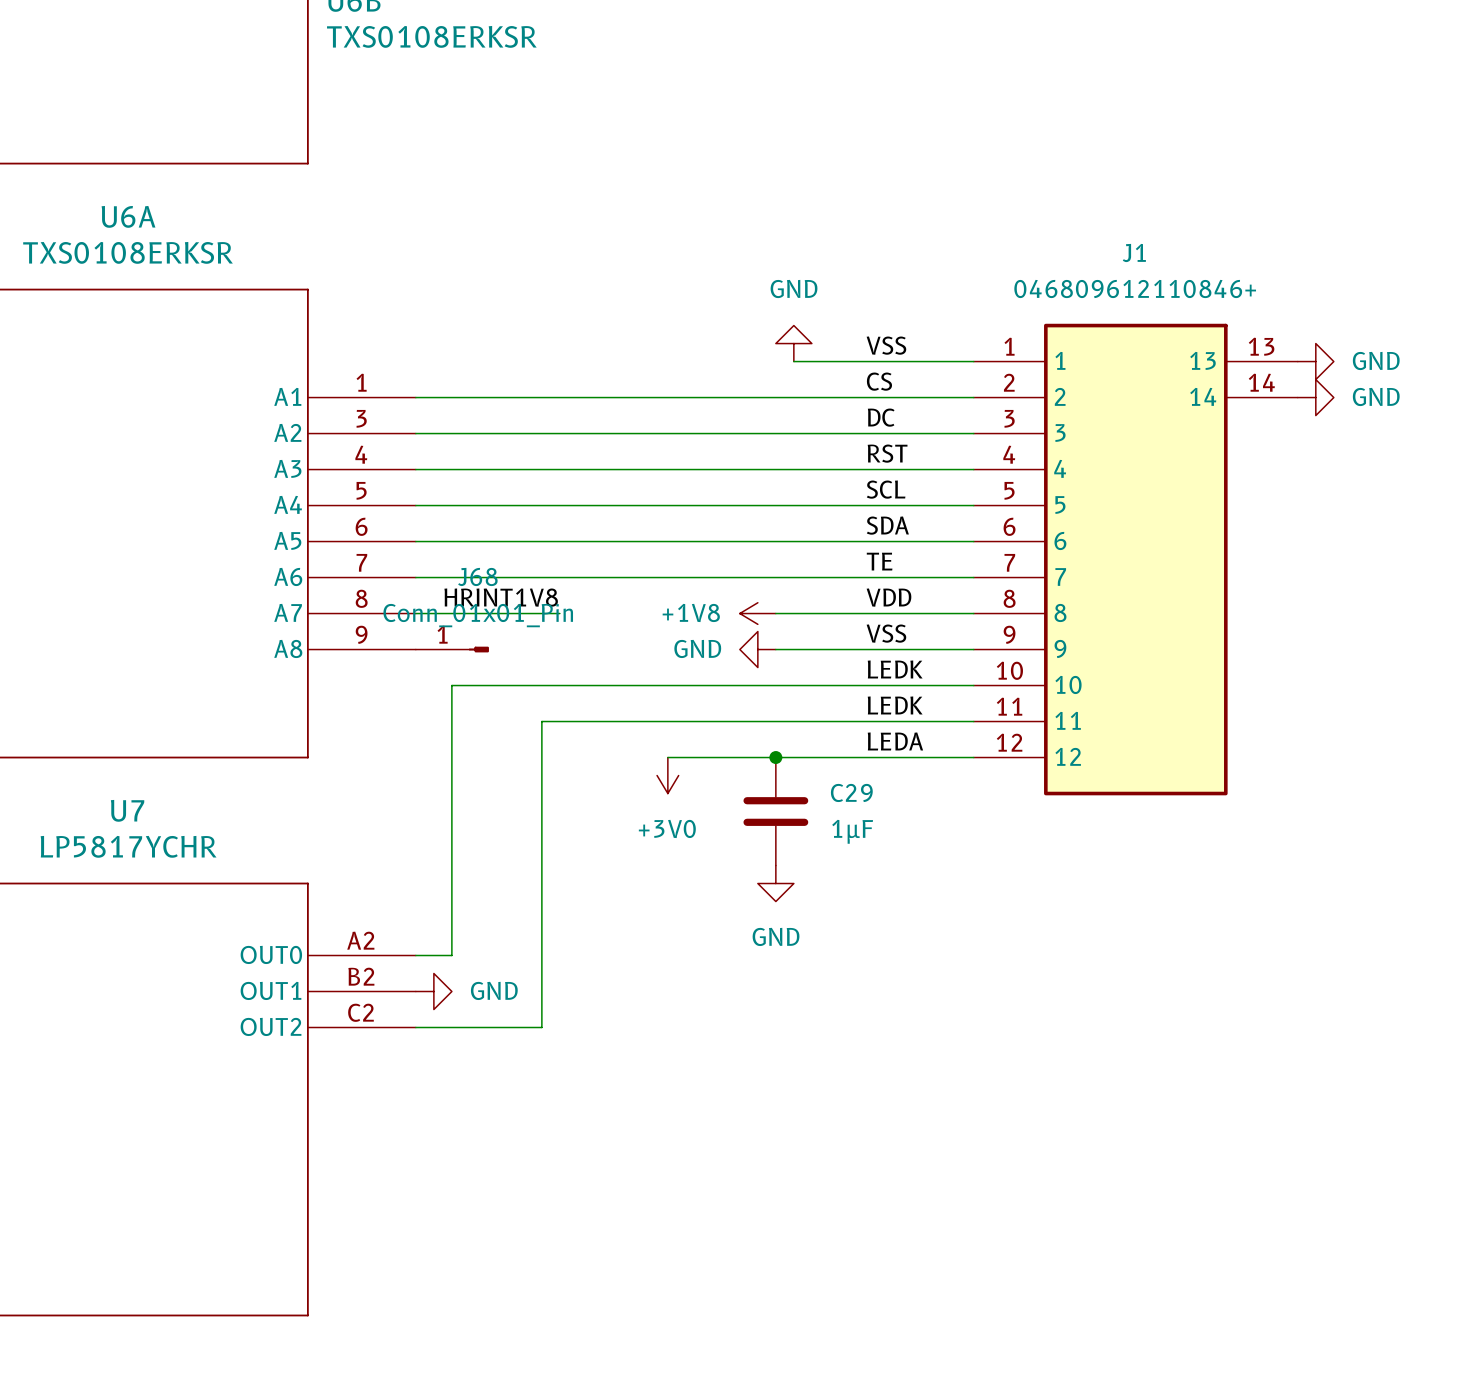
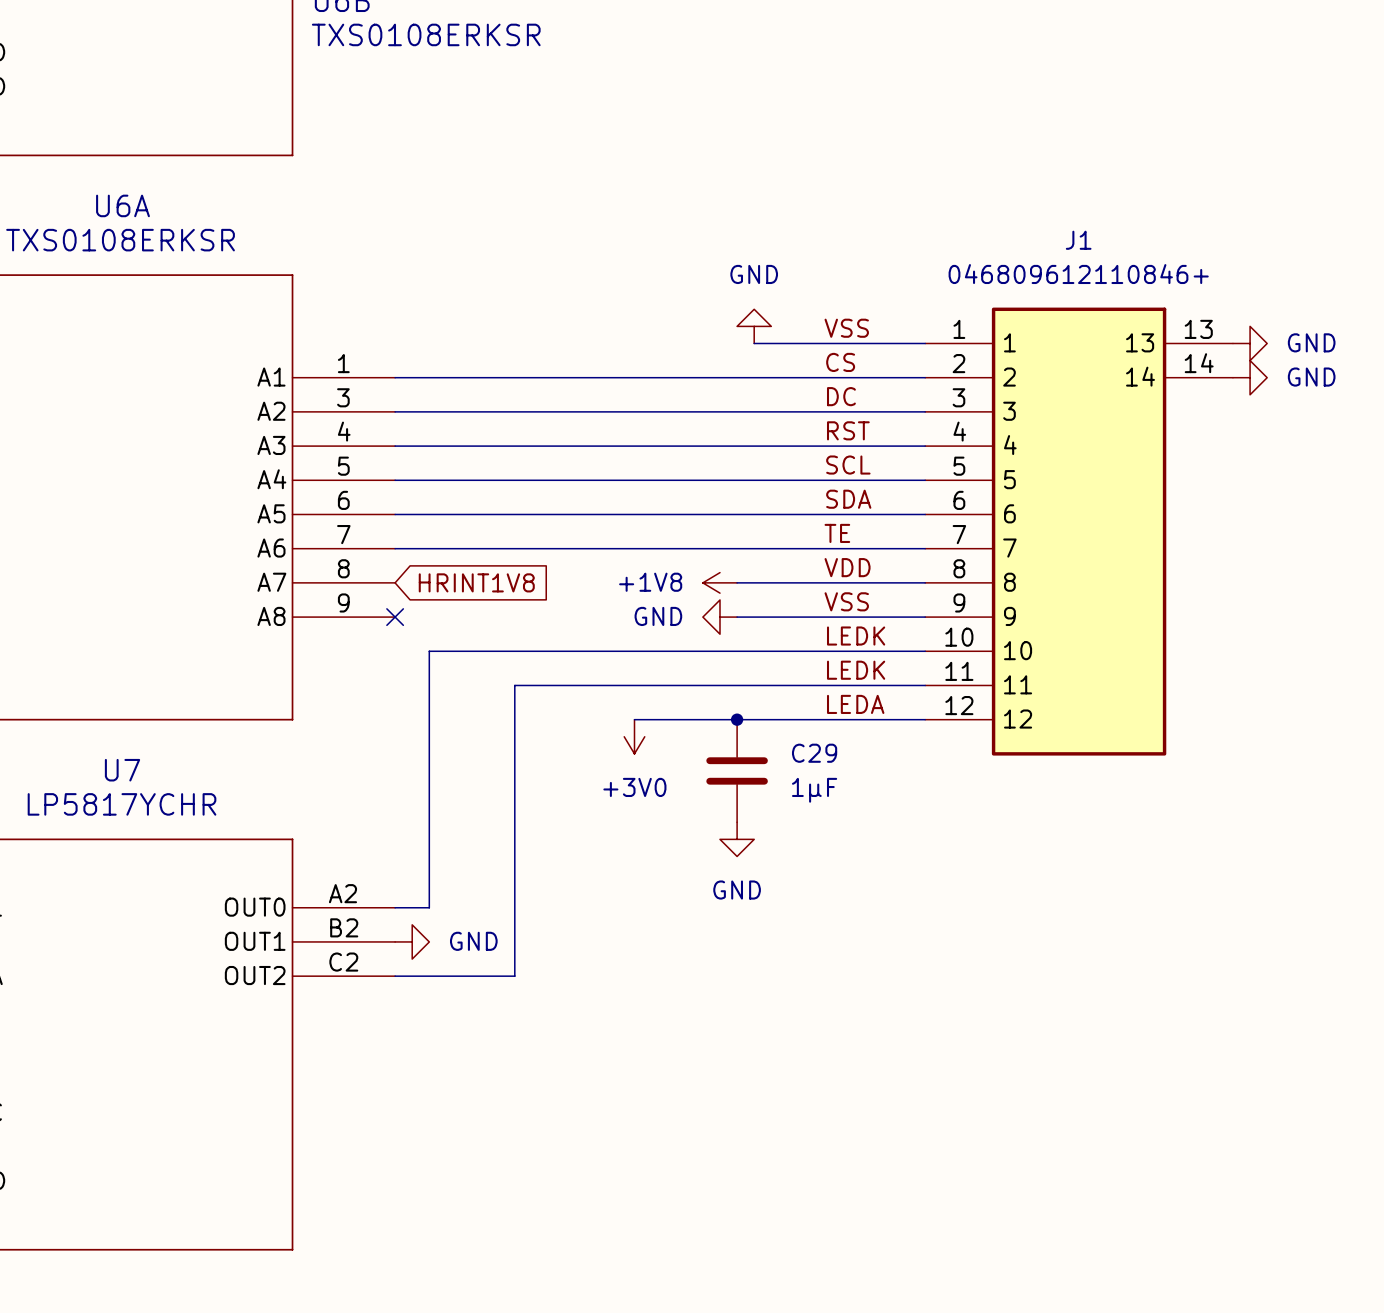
label: HRINT1V8 (501, 597) -> none
wire: (415, 613) (559, 613) -> none
global label: none -> HRINT1V8 (476, 582)
no-connect mark: none -> (395, 617)
J68: Conn_01x01_Pin (452, 649) -> none

